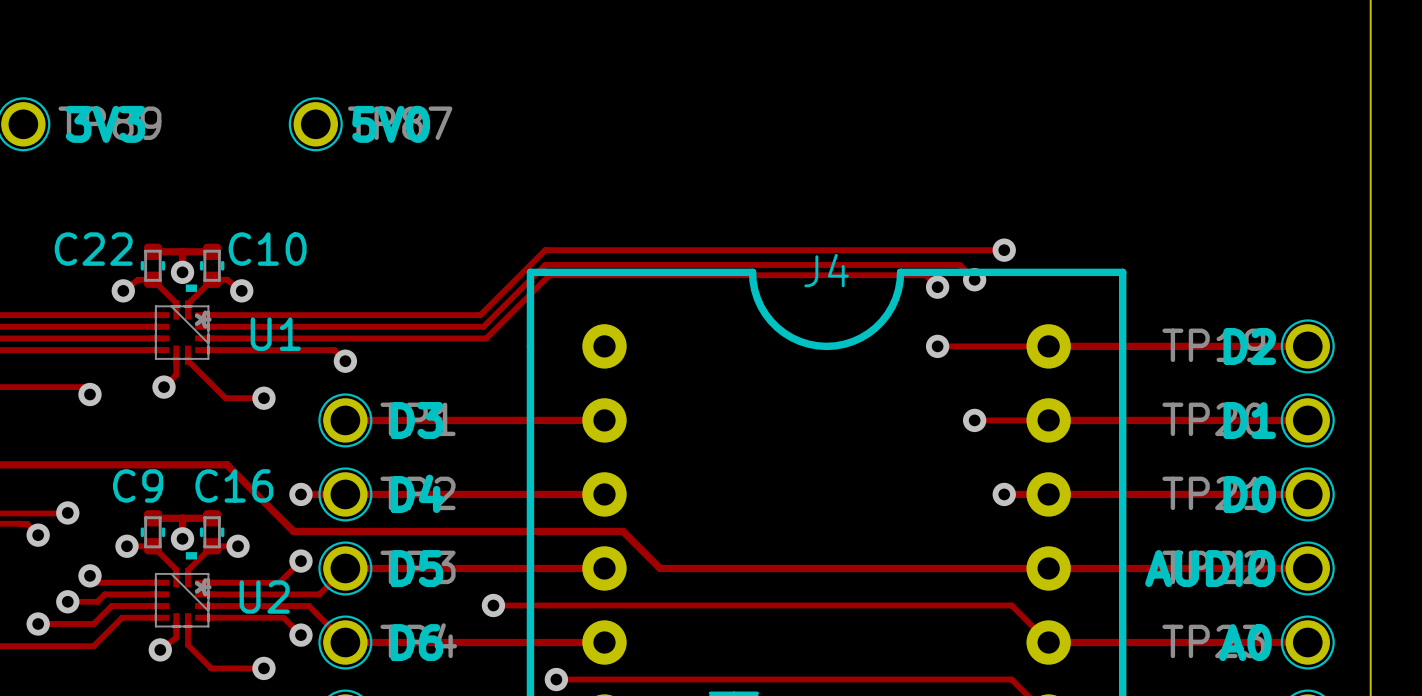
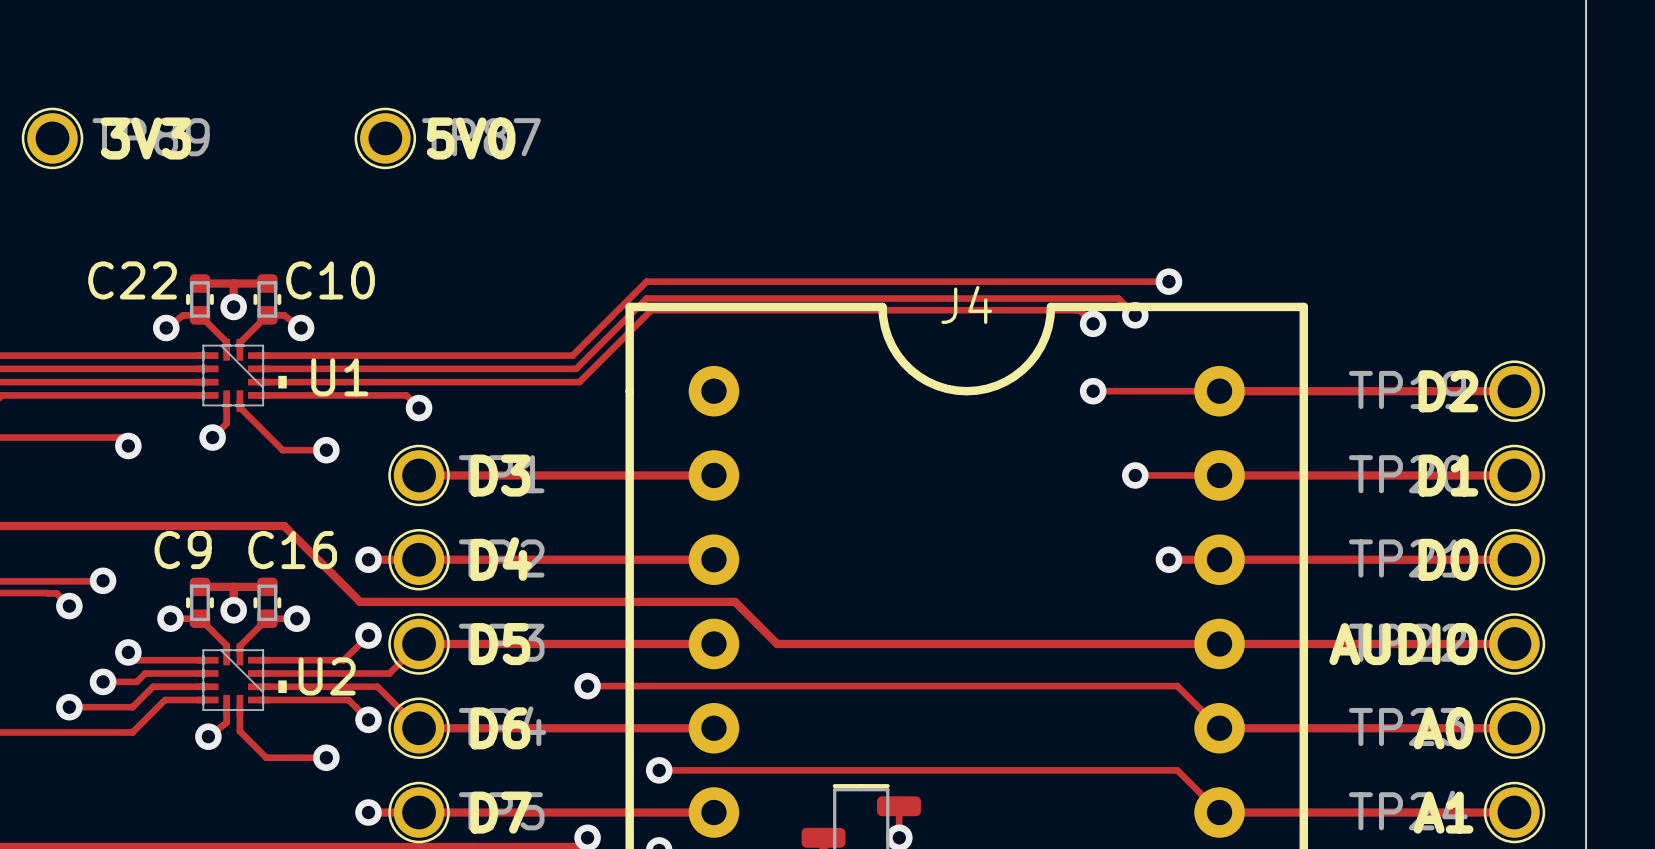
U1 footprint: [149, 284, 215, 365] -> [196, 338, 287, 413]
U2 footprint: [149, 552, 215, 633] -> [196, 643, 287, 717]

